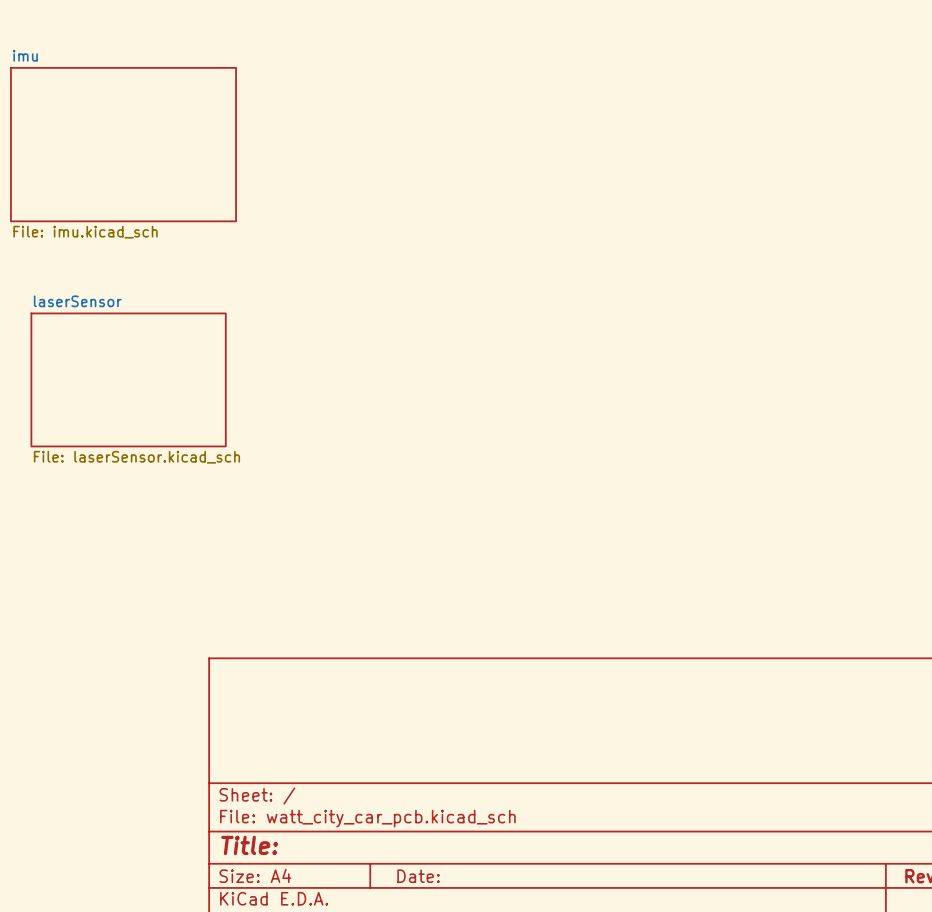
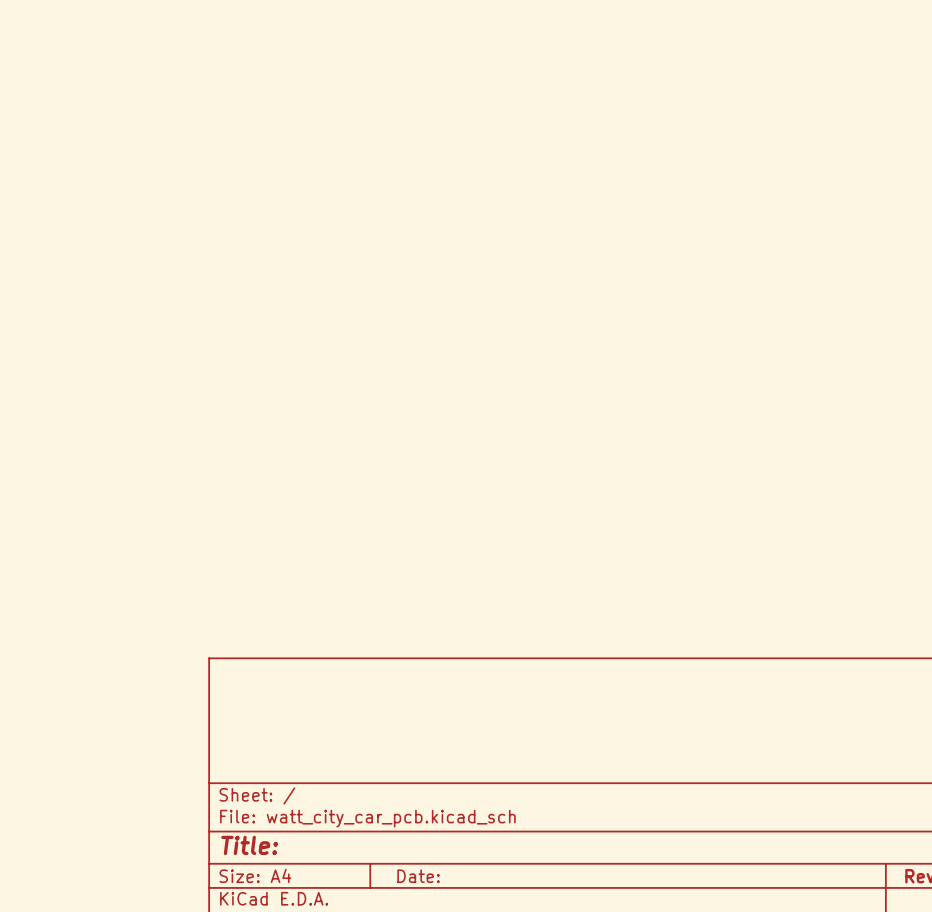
sheet imu: File: imu.kicad_sch (123, 144) -> none
sheet laserSensor: File: laserSensor.kicad_sch (128, 379) -> none

